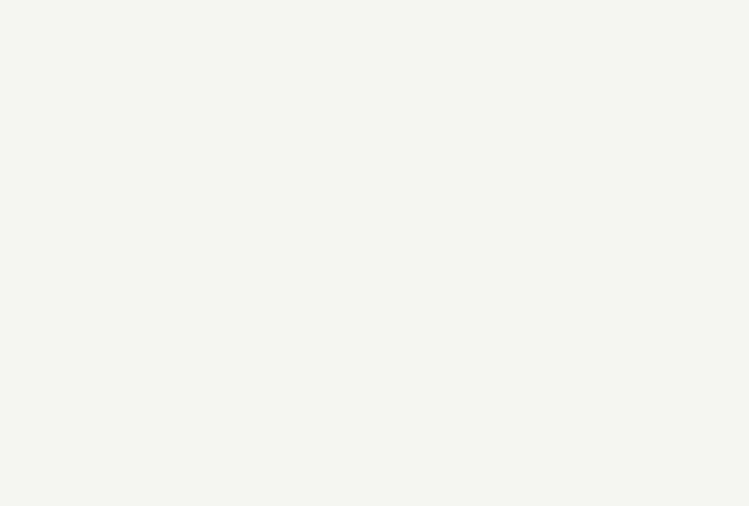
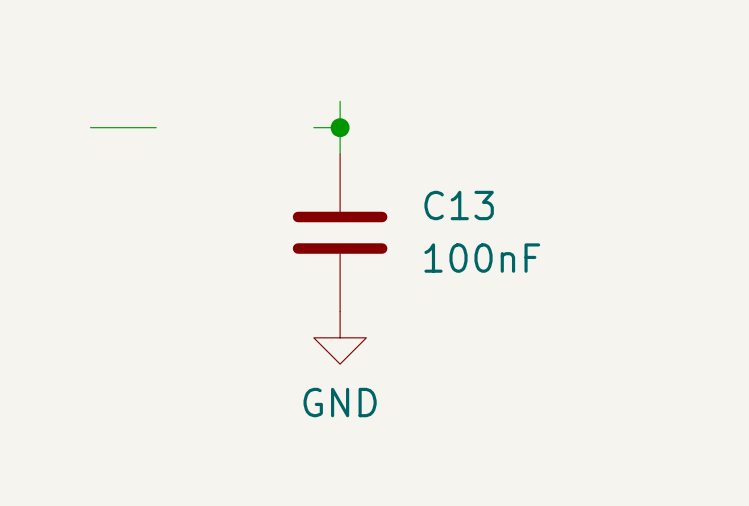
wire: none -> (340, 101) (340, 153)
wire: none -> (90, 127) (156, 127)
wire: none -> (313, 127) (340, 127)
junction: none -> (340, 127)
C13: none -> 100nF (340, 232)
power symbol: none -> GND (340, 337)

